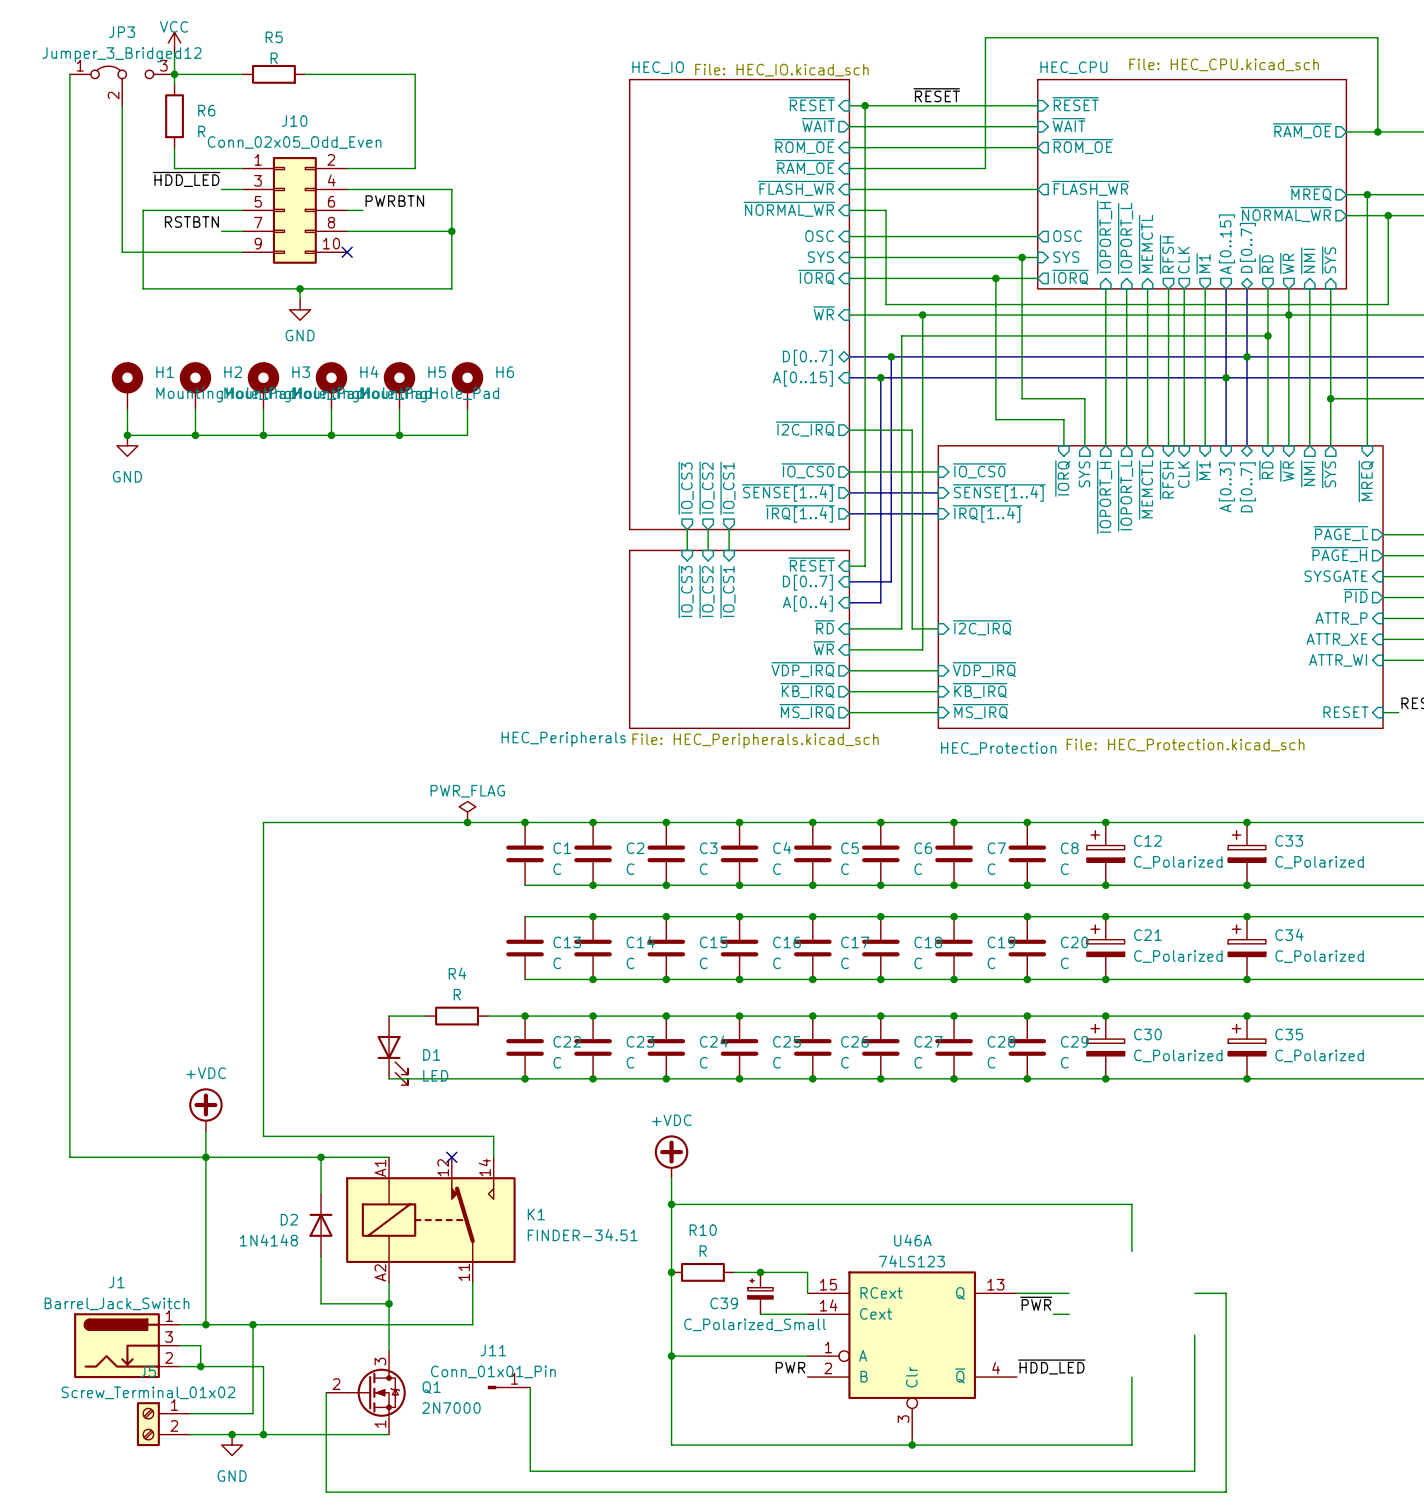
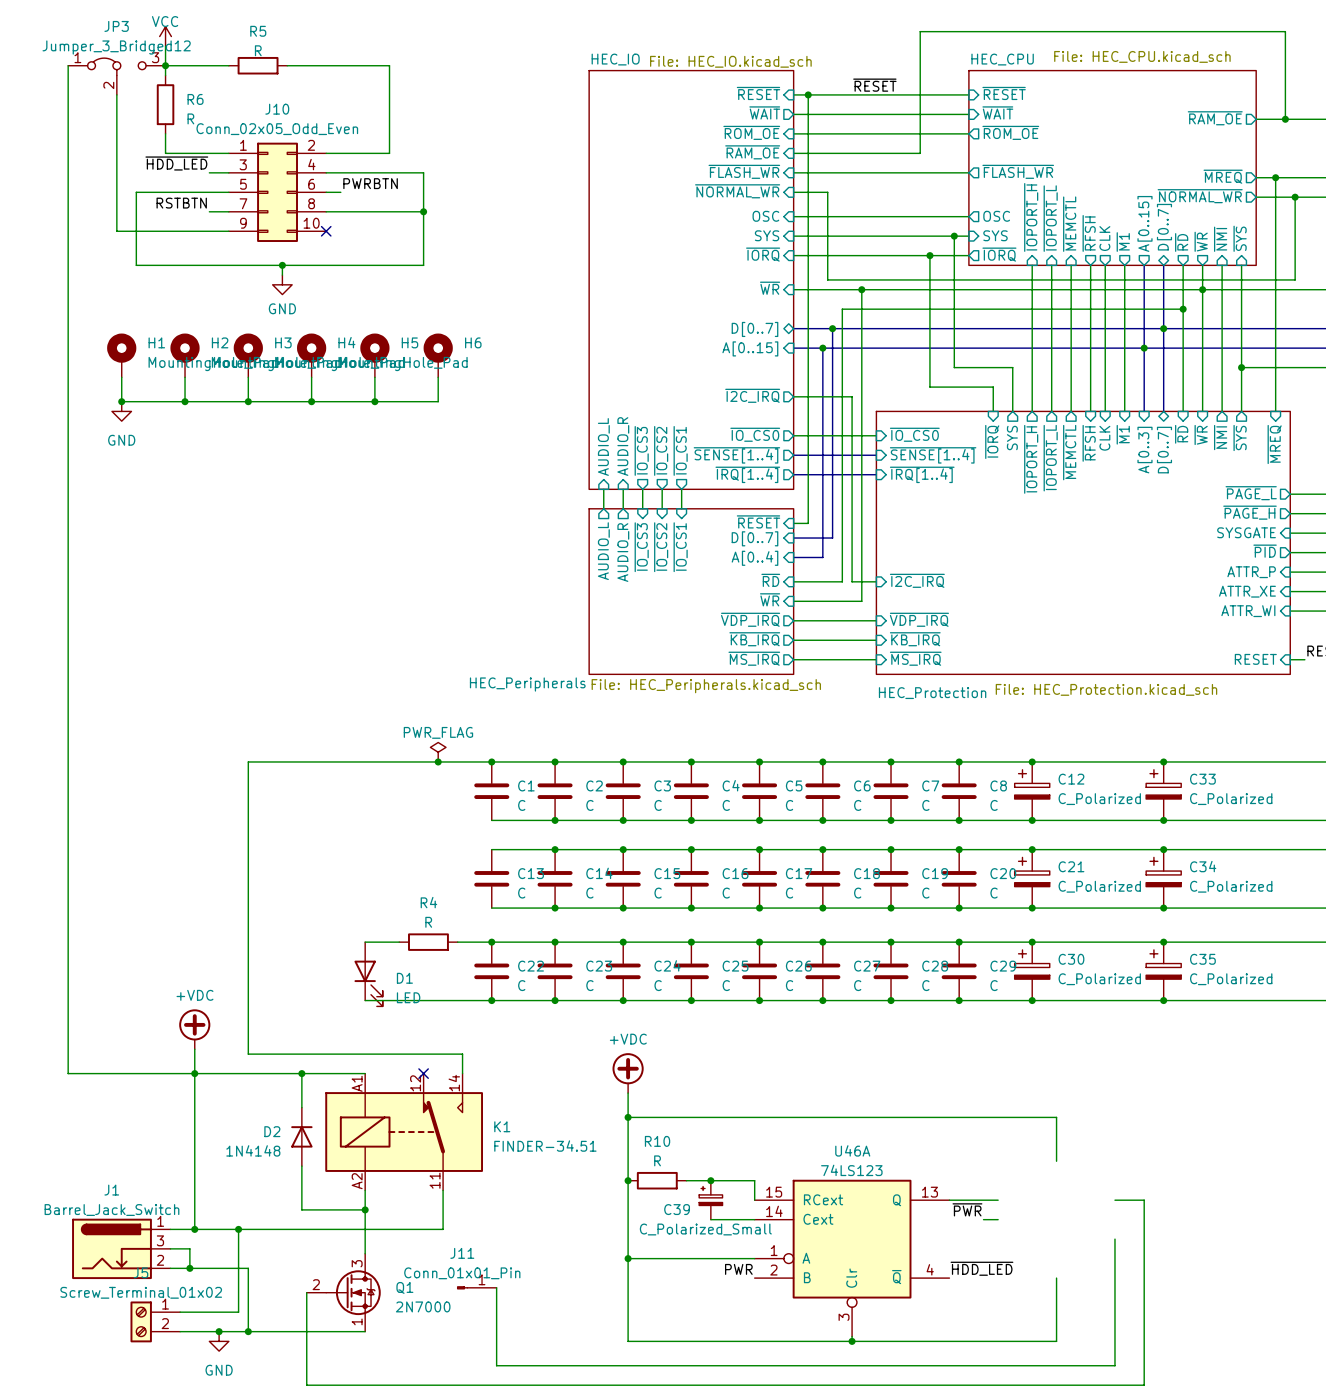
sheet pin: none -> AUDIO_R (623, 446)
sheet pin: none -> AUDIO_L (603, 446)
wire: none -> (603, 489) (603, 508)
wire: none -> (623, 489) (623, 508)
sheet pin: none -> AUDIO_L (603, 551)
sheet pin: none -> AUDIO_R (623, 552)

